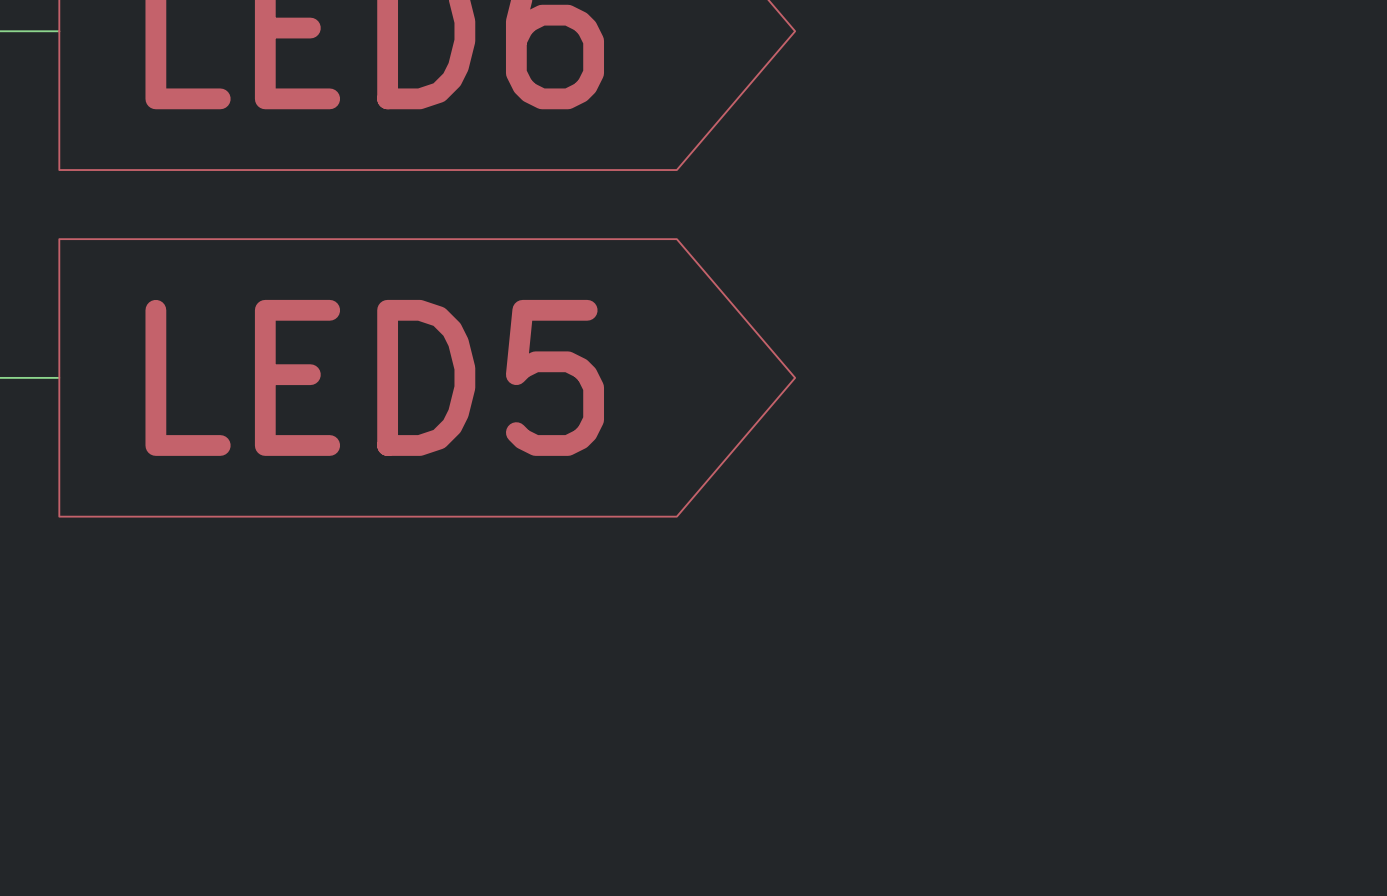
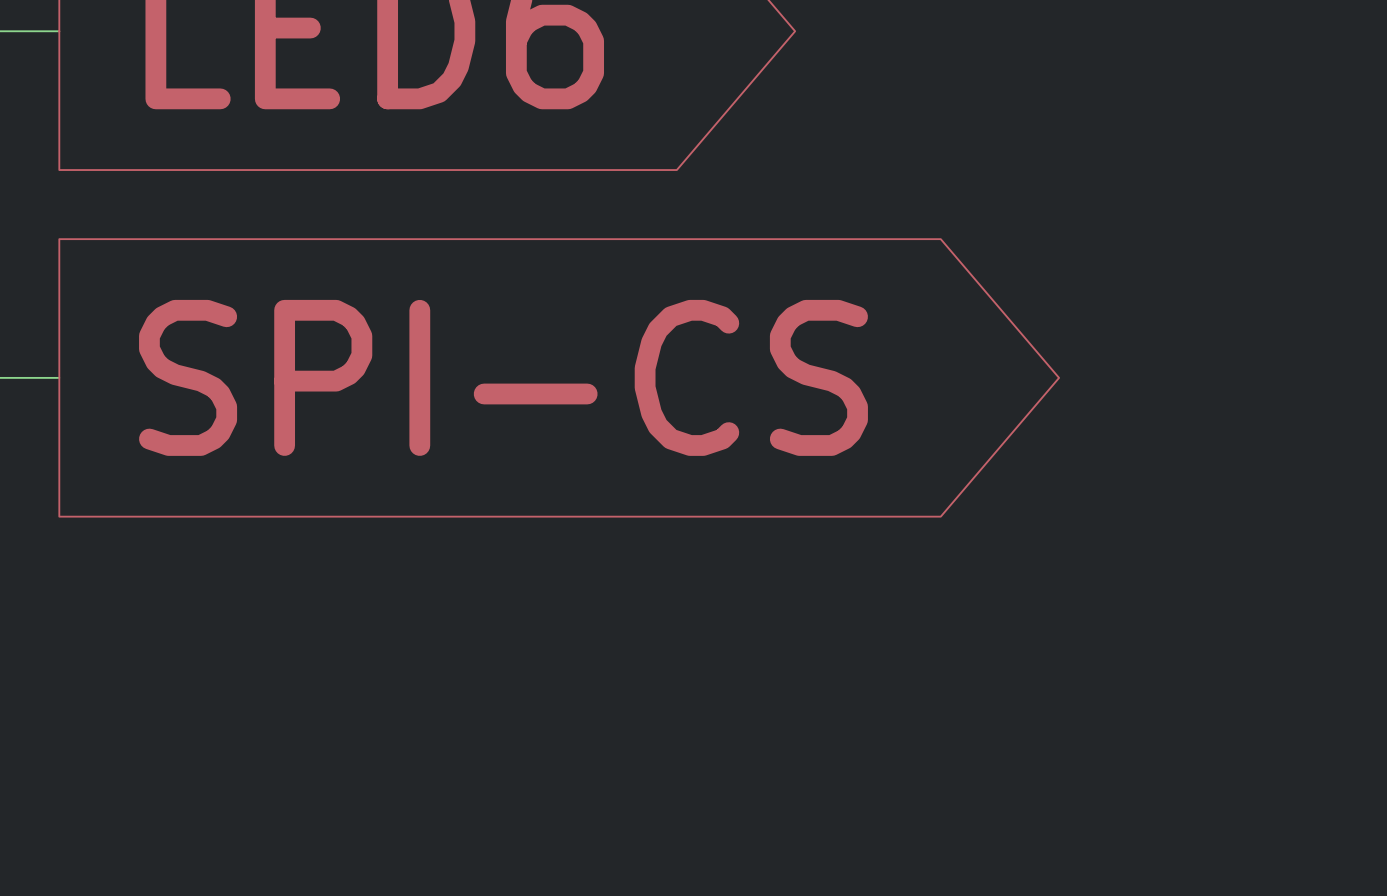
global label: LED5 (374, 377) -> SPI-CS (503, 377)

